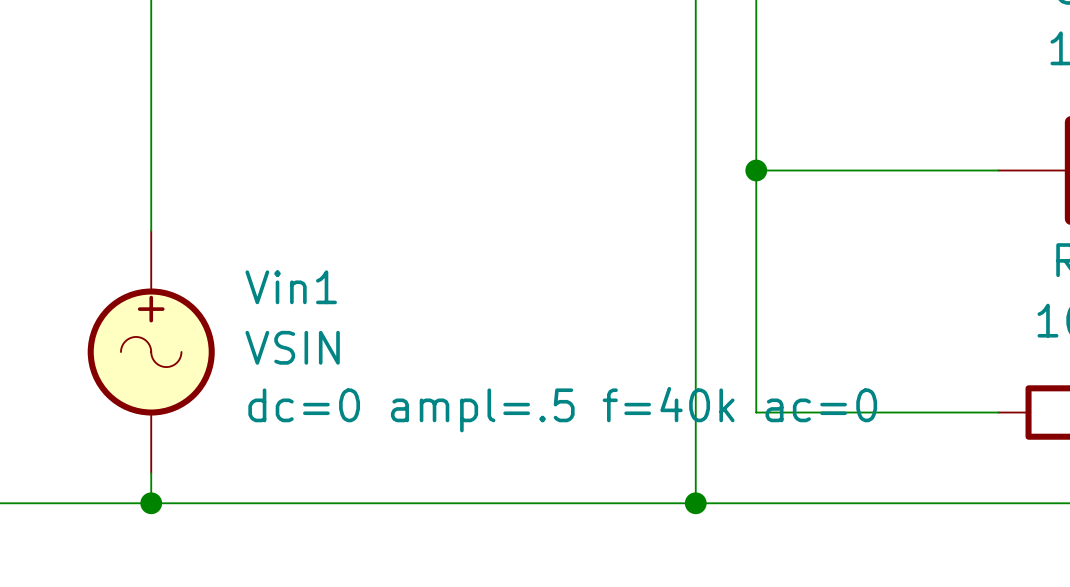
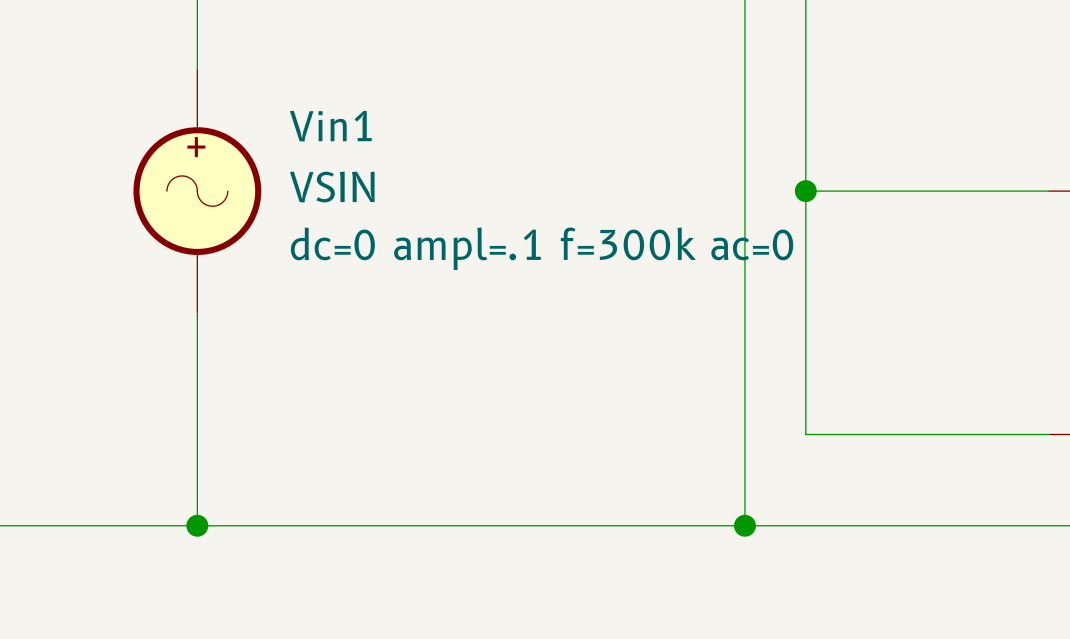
Vin1 position: (151, 352) -> (197, 191)
Vin1 text: dc=0 ampl=.5 f=40k ac=0 (562, 409) -> dc=0 ampl=.1 f=300k ac=0 (542, 248)

